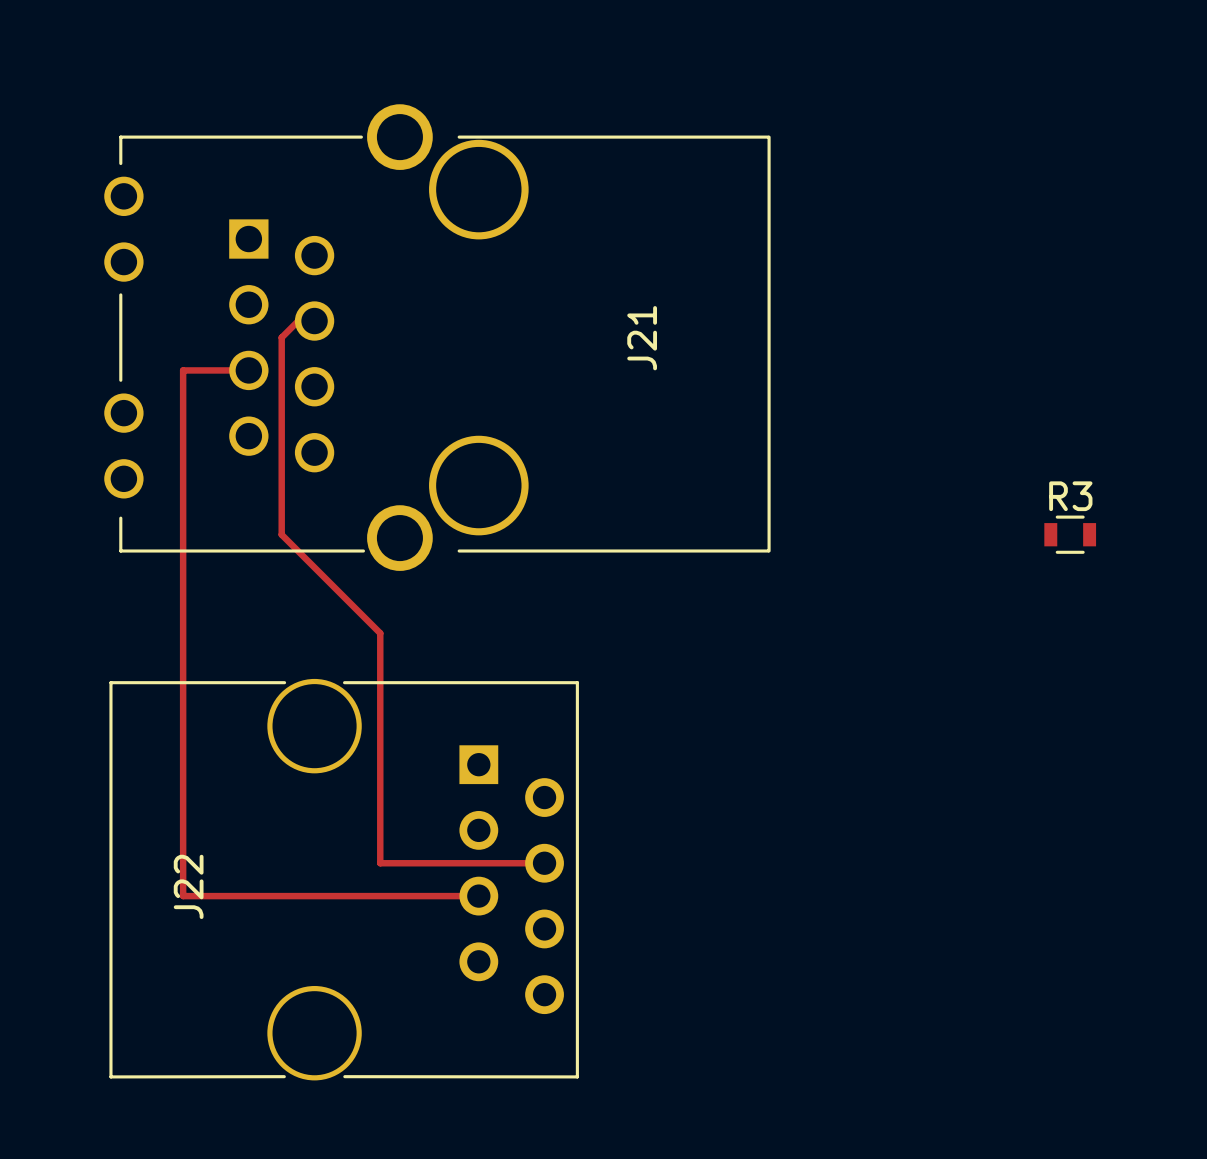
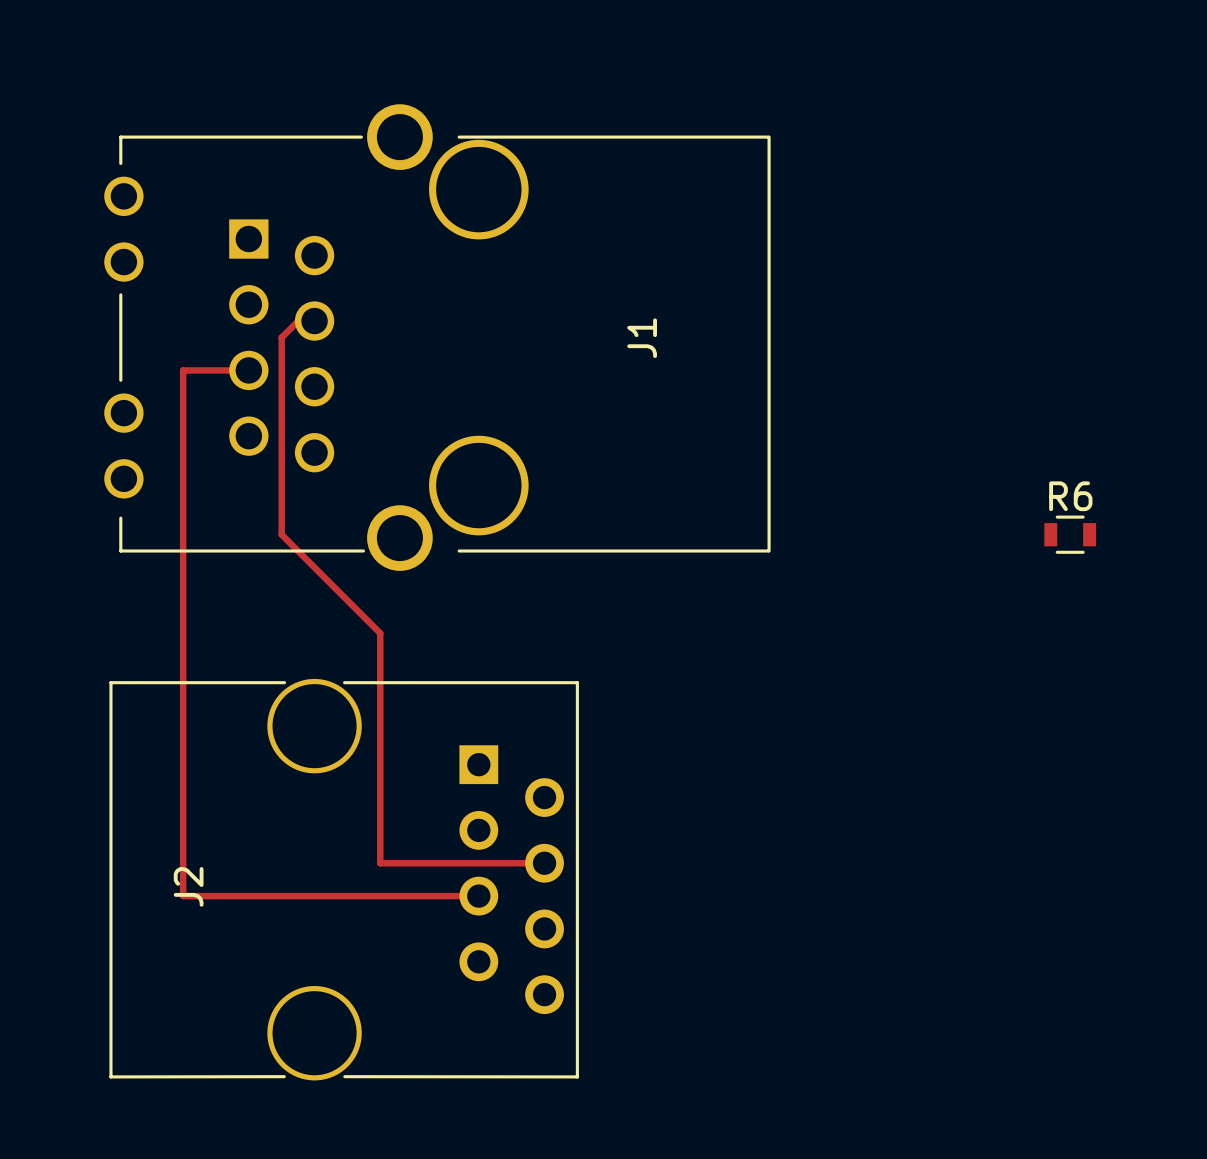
J21 name: J21 (642, 338) -> J1 (642, 338)
R3 name: R3 (1070, 496) -> R6 (1070, 496)
J22 name: J22 (188, 886) -> J2 (188, 886)

